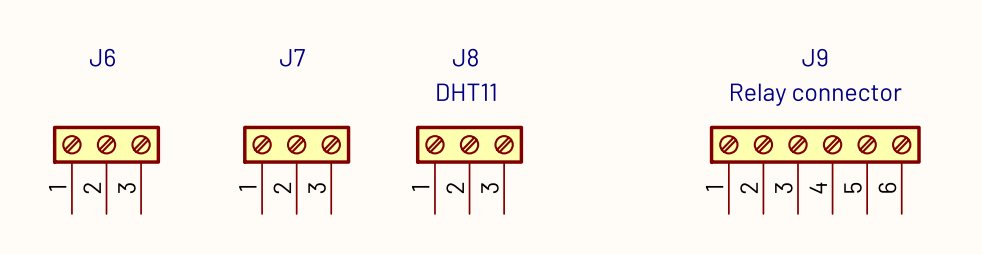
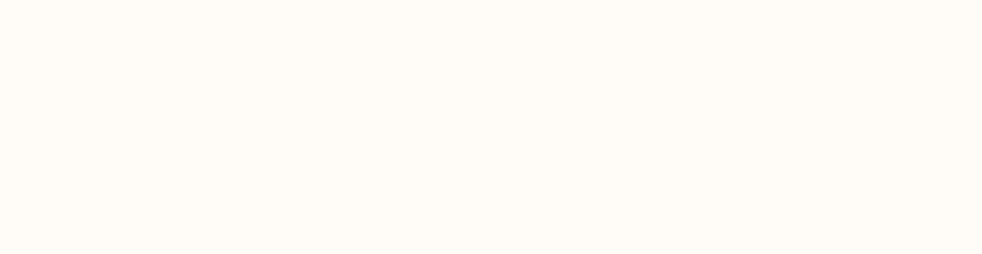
J6: (106, 169) -> none
J7: (296, 169) -> none
J8: DHT11 (469, 169) -> none
J9: Relay connector (815, 169) -> none

